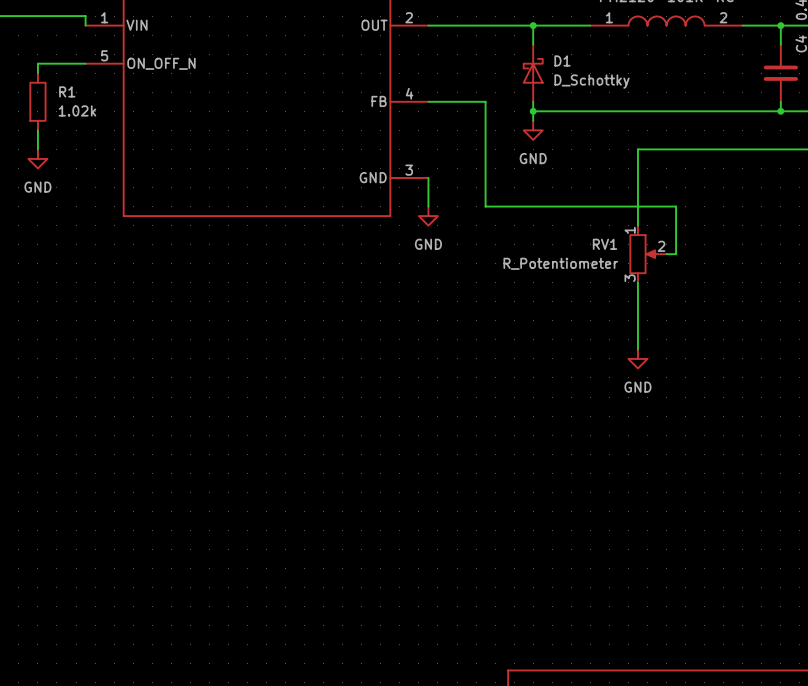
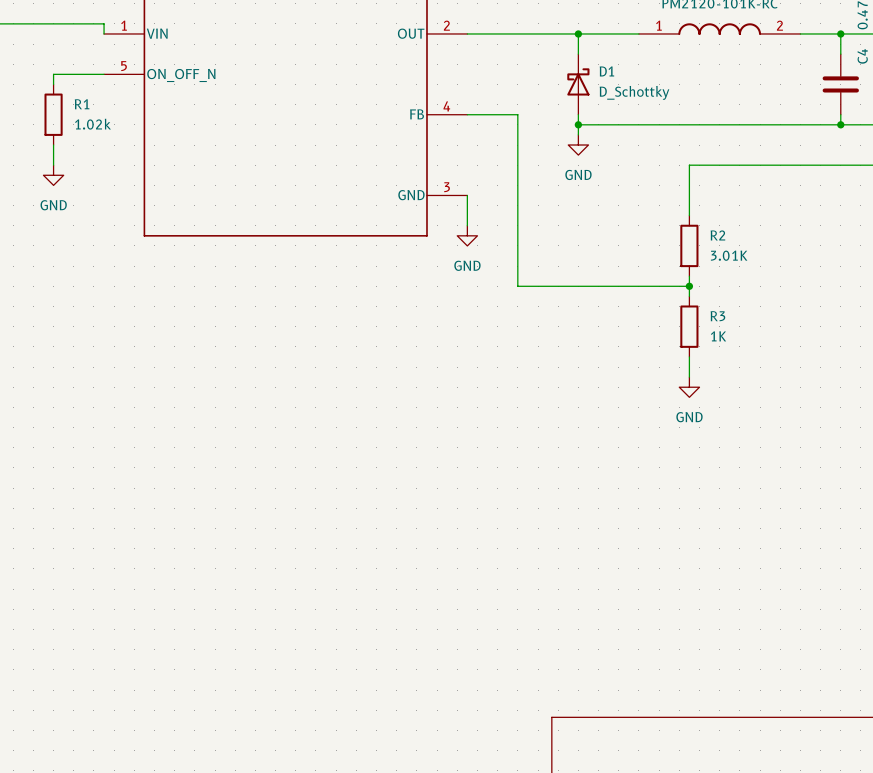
wire: (476, 101) (485, 101) (485, 206) (676, 206) (676, 254) (666, 254) -> (517, 114) (517, 286) (689, 286)
wire: (637, 197) (637, 225) -> none
R2: none -> 3.01K (689, 245)
wire: none -> (689, 276) (689, 296)
RV1: R_Potentiometer (647, 254) -> none
junction: none -> (689, 286)
wire: (637, 282) (637, 330) -> none
R3: none -> 1K (689, 326)

